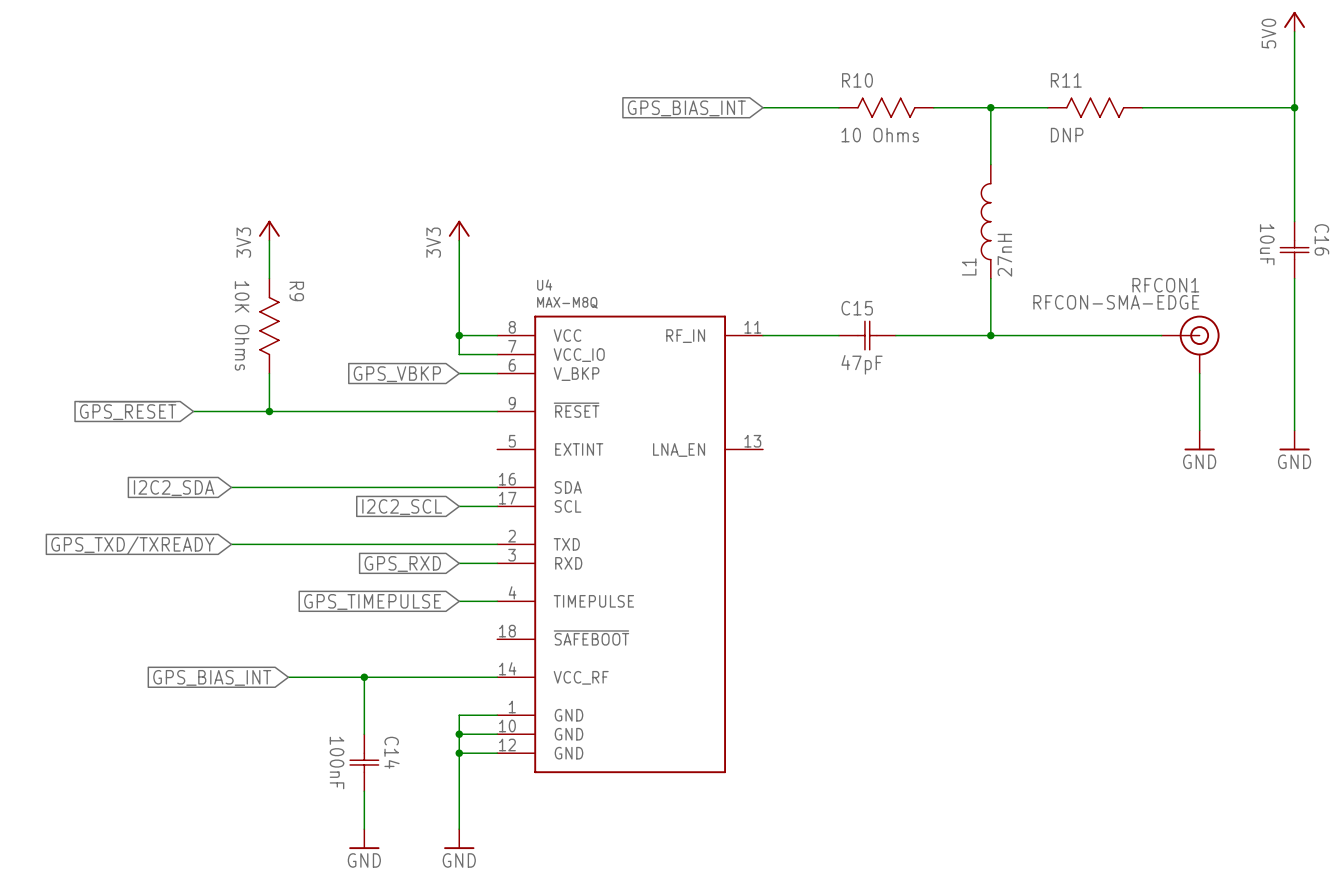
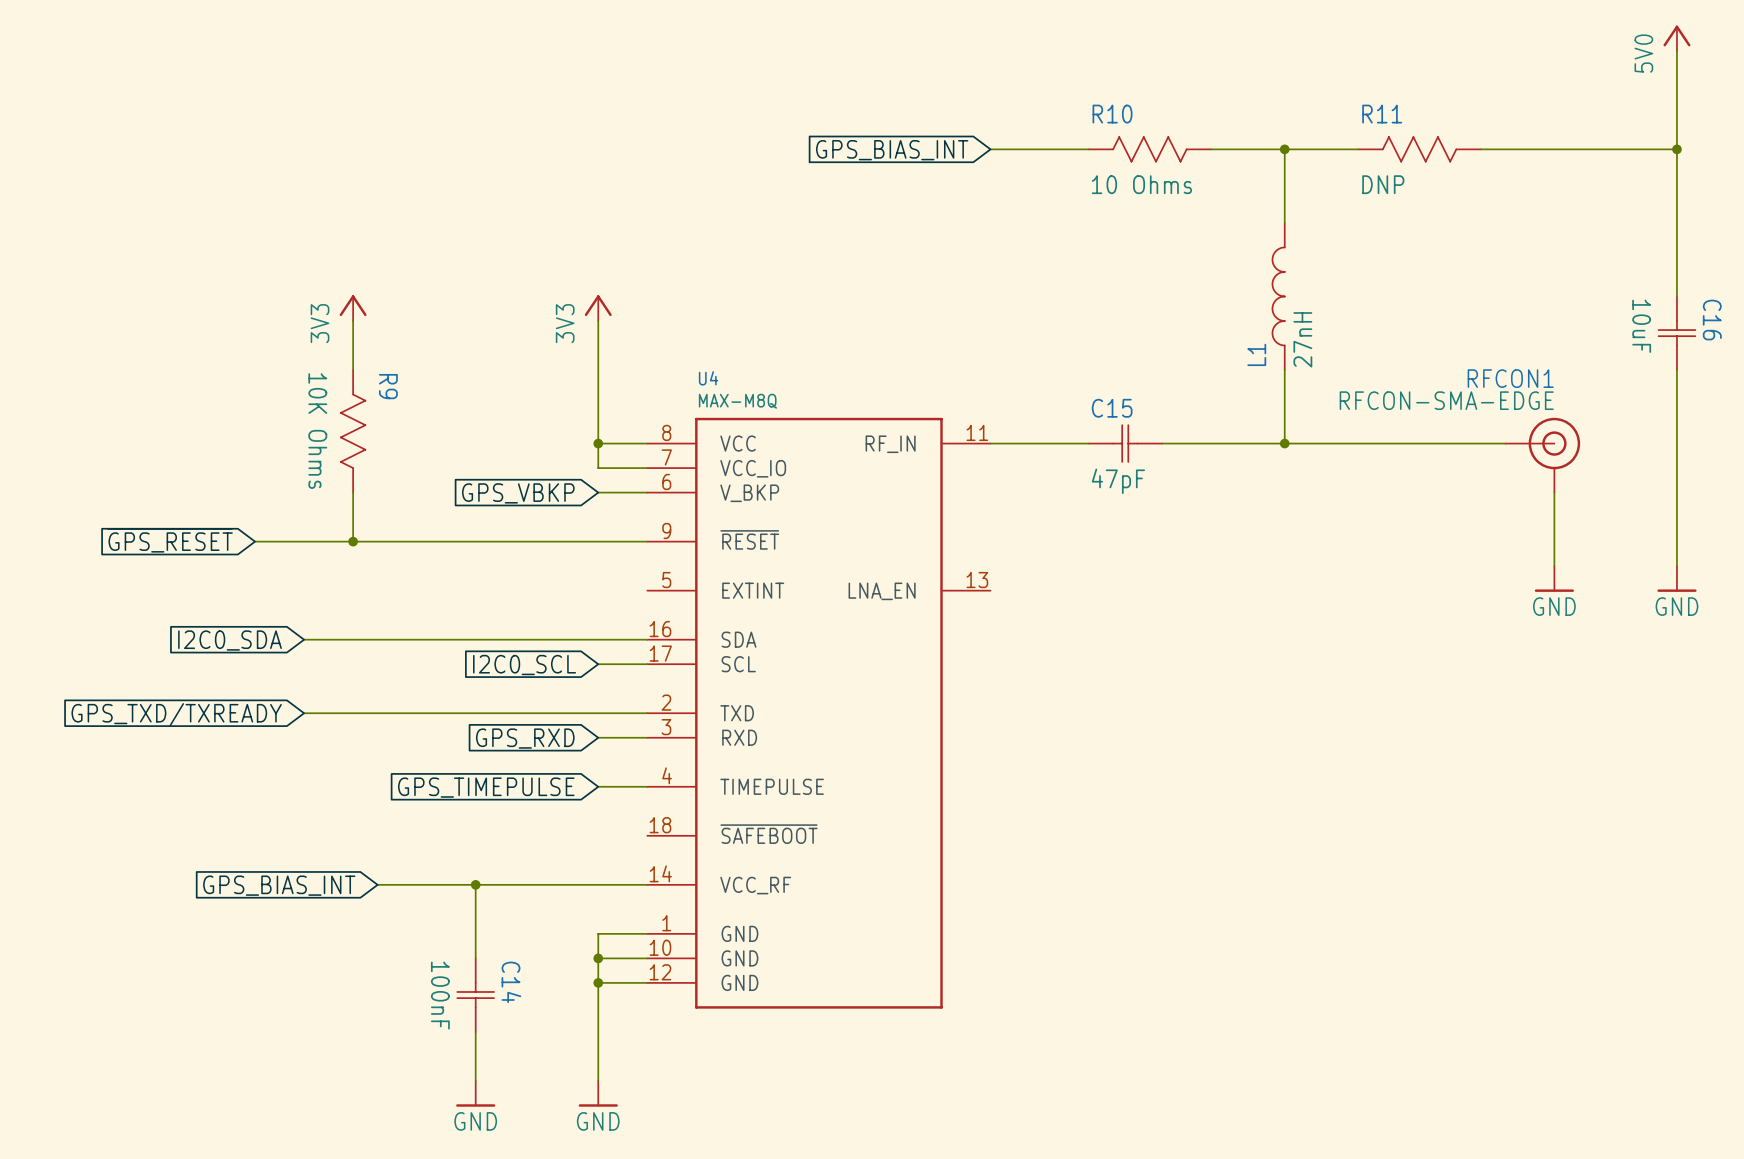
global label: I2C2_SDA (174, 488) -> I2C0_SDA (229, 640)
global label: I2C2_SCL (402, 507) -> I2C0_SCL (524, 665)

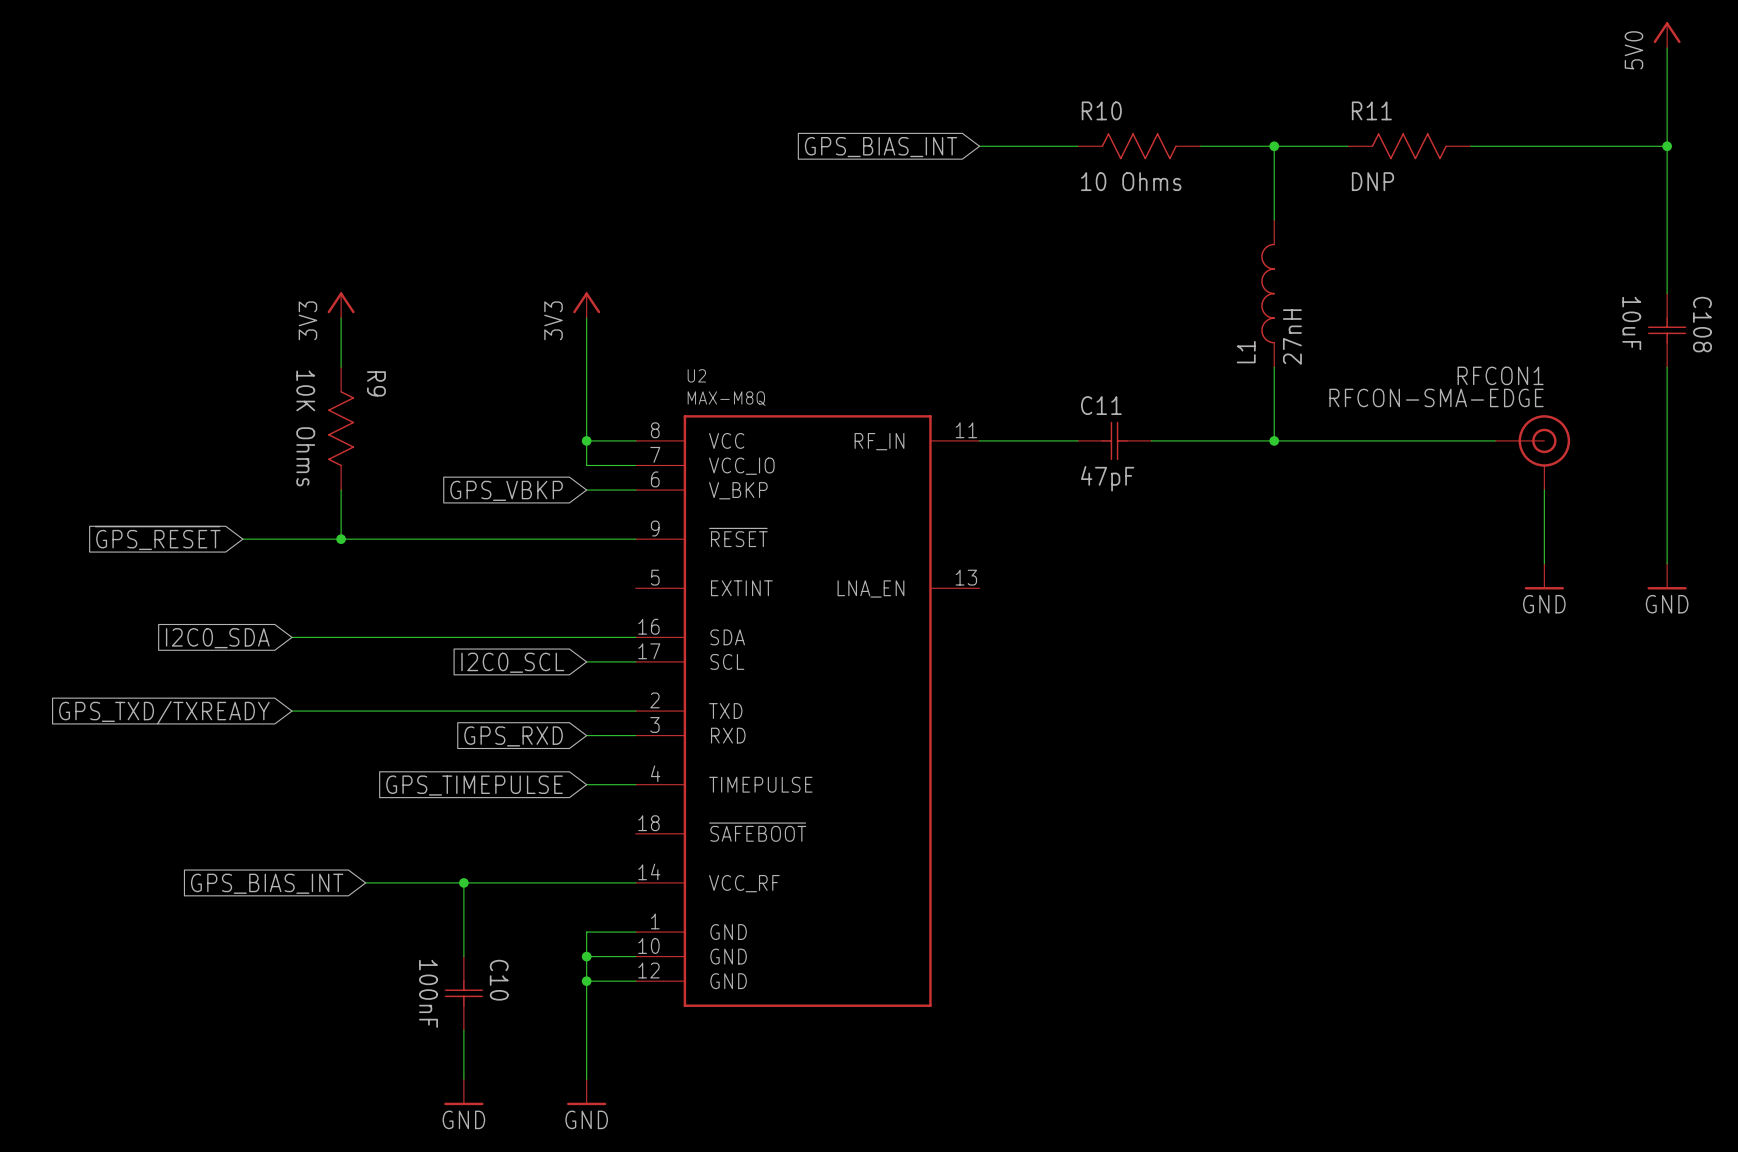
C16 name: C16 (1712, 320) -> C108 (1702, 324)
U4 name: U4 (708, 378) -> U2 (696, 375)
C15 name: C15 (1112, 408) -> C11 (1101, 405)
C14 name: C14 (511, 982) -> C10 (499, 980)

